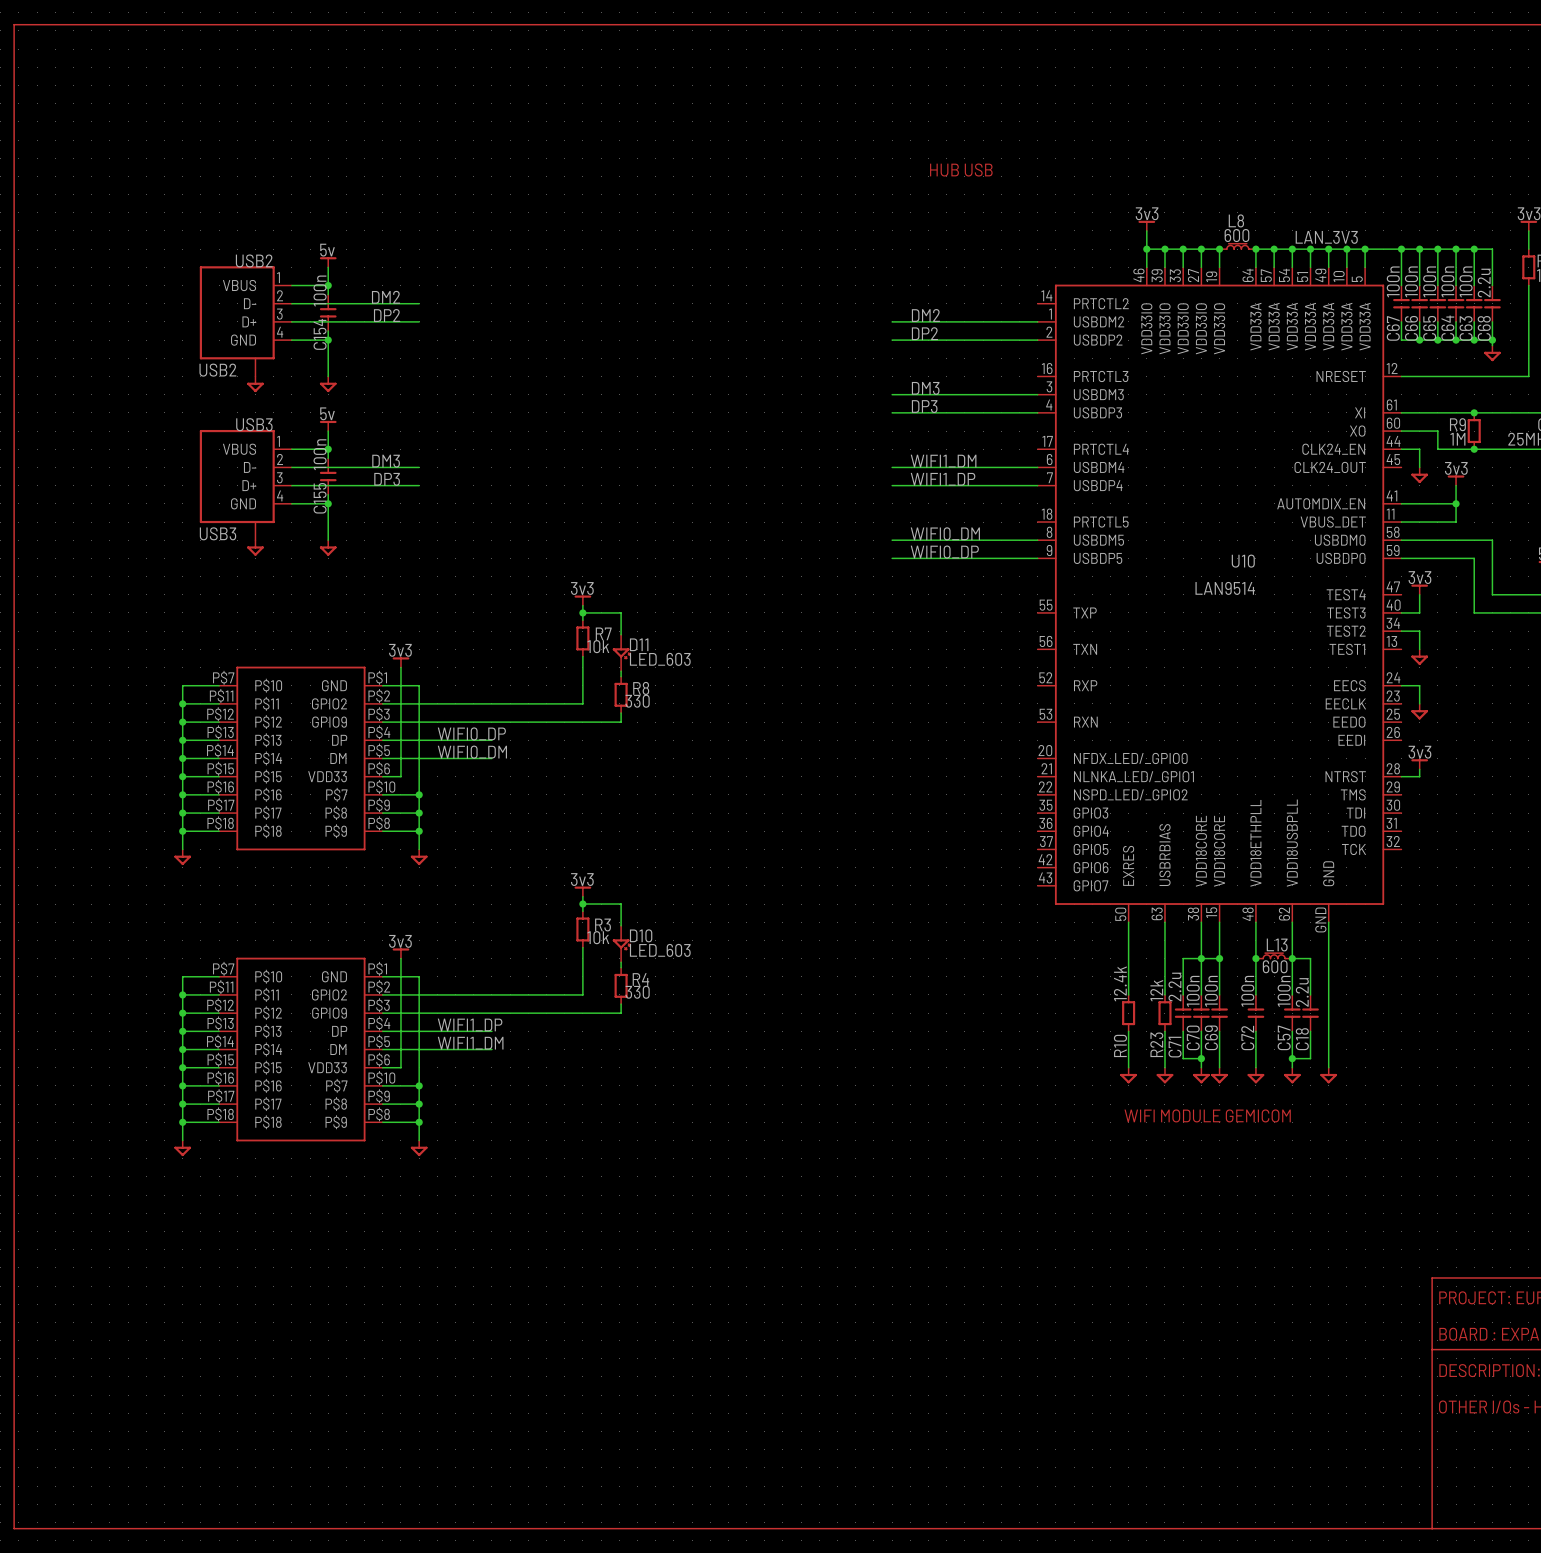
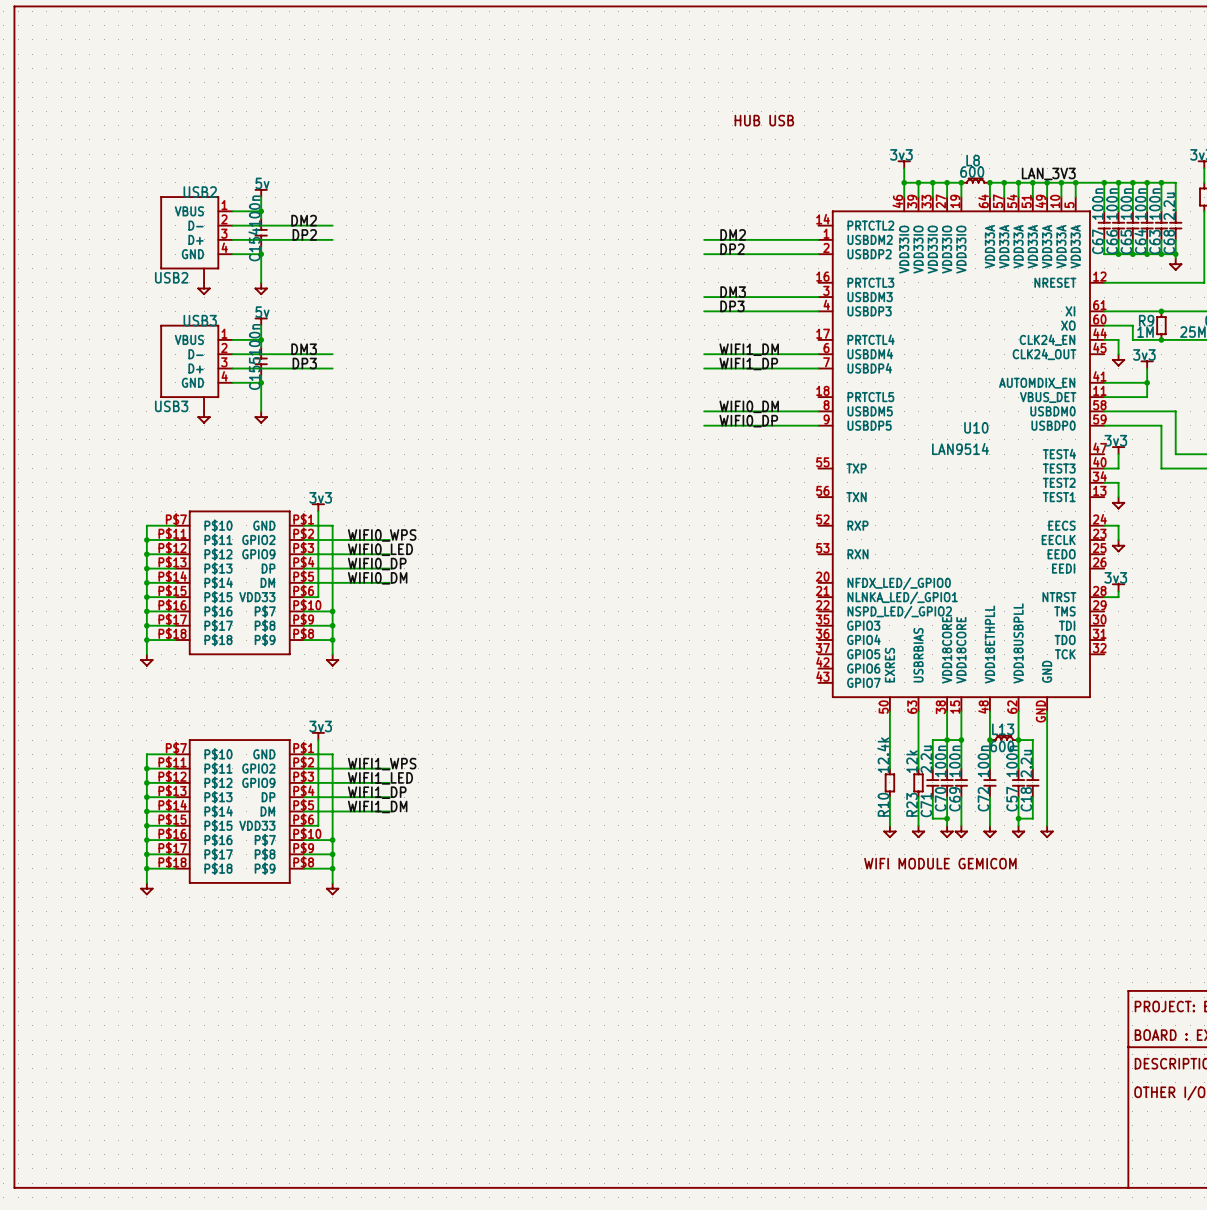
power symbol: (582, 600) -> none
wire: (582, 605) (582, 620) -> none
wire: (582, 612) (621, 612) (621, 634) -> none
junction: (582, 612) -> none
R7: 10k (582, 638) -> none
D11: LED_603 (621, 652) -> none
wire: (582, 656) (582, 703) (491, 703) -> none
wire: (621, 671) (621, 676) -> none
R8: 330 (621, 694) -> none
label: none -> WIFI0_WPS (382, 535)
wire: (621, 713) (621, 722) (491, 722) -> none
label: none -> WIFI0_LED (380, 549)
power symbol: (582, 892) -> none
wire: (582, 896) (582, 911) -> none
wire: (582, 904) (621, 904) (621, 925) -> none
junction: (582, 904) -> none
R3: 10k (582, 929) -> none
D10: LED_603 (621, 944) -> none
wire: (582, 947) (582, 994) (491, 994) -> none
wire: (621, 962) (621, 967) -> none
R4: 330 (621, 985) -> none
label: none -> WIFI1_WPS (382, 764)
wire: (621, 1004) (621, 1013) (491, 1013) -> none
label: none -> WIFI1_LED (380, 778)

